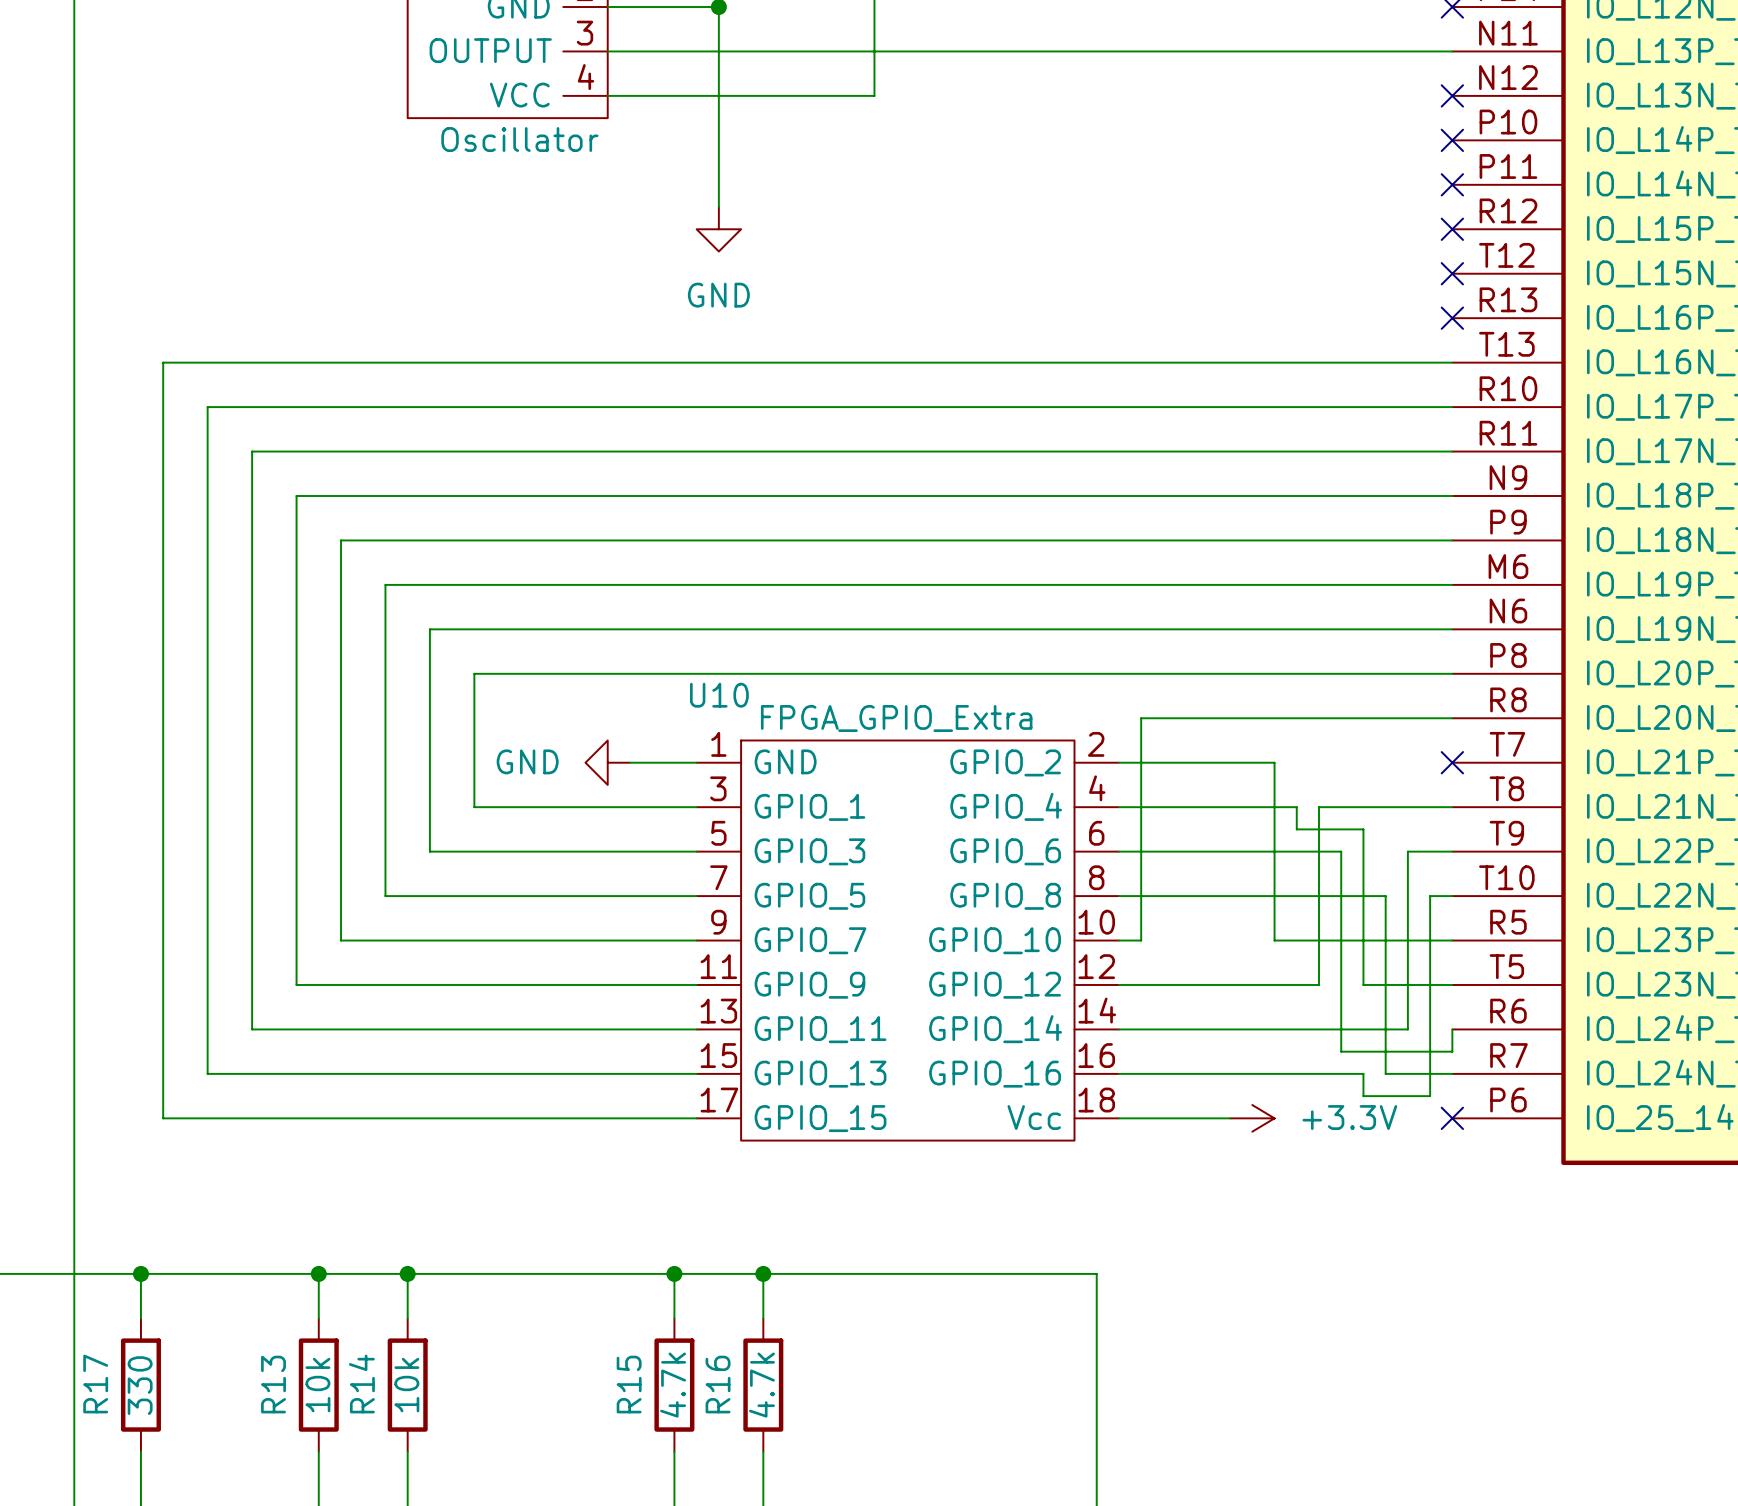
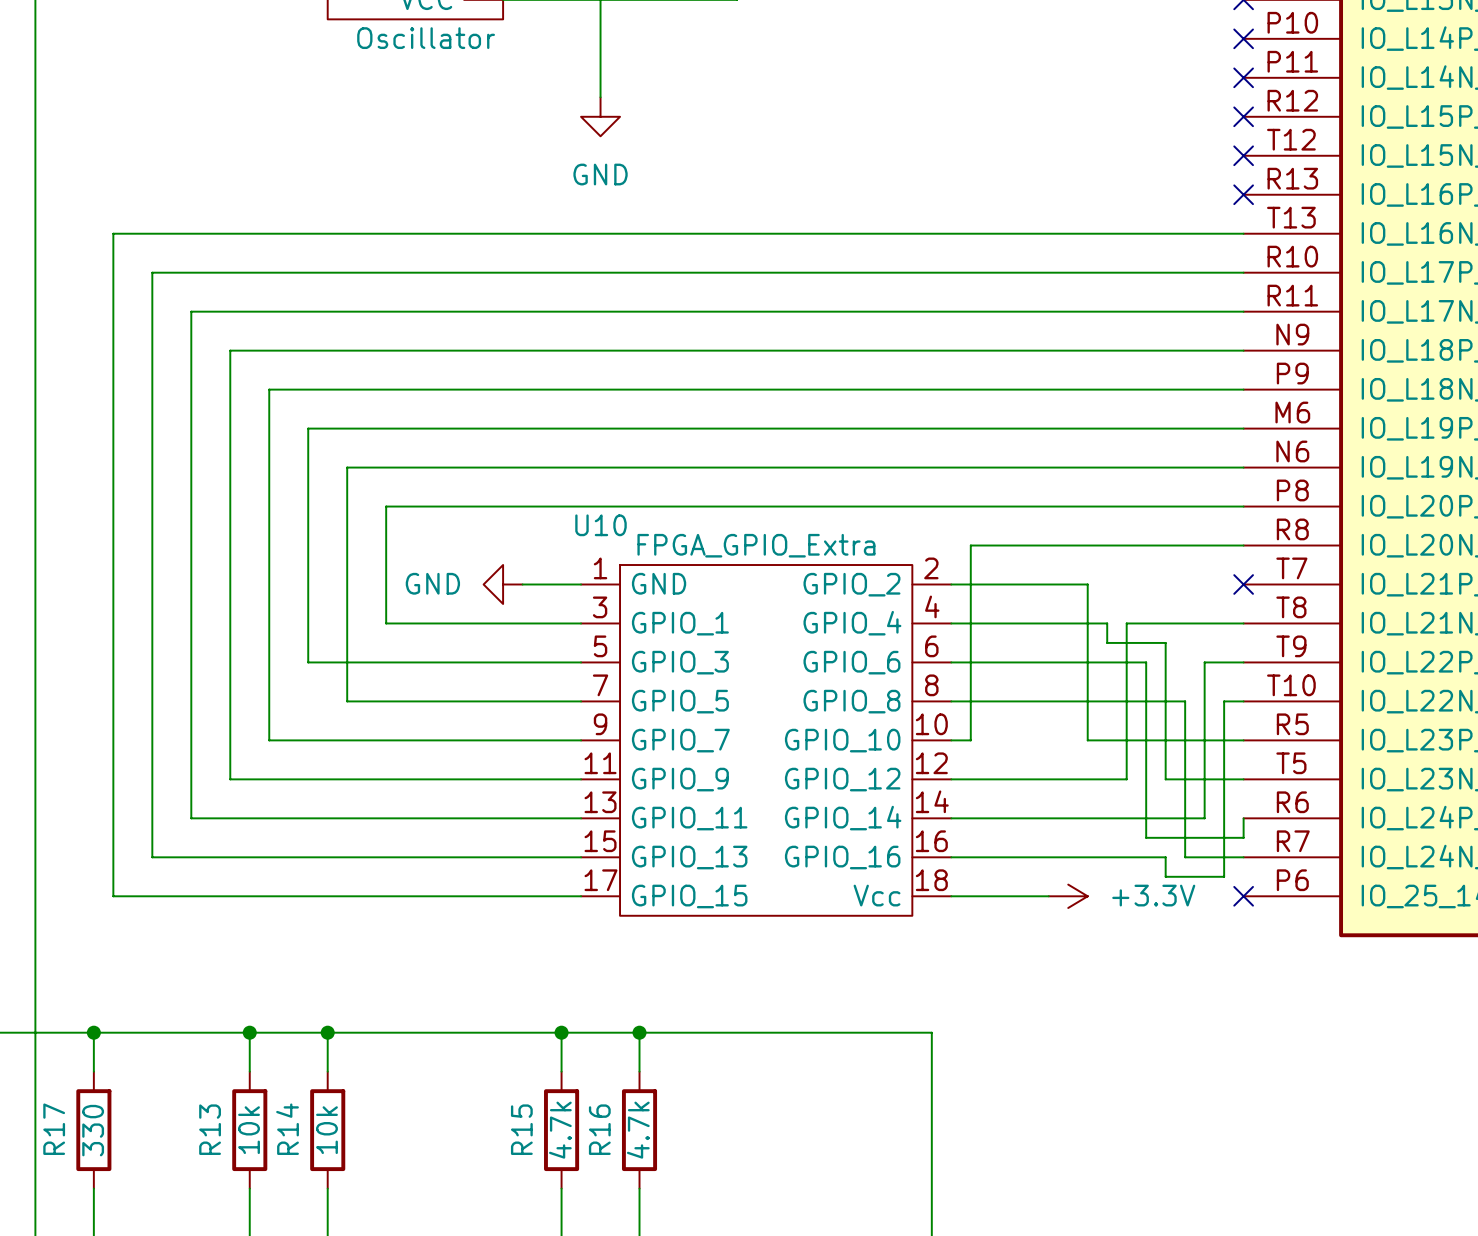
wire: (385, 851) (385, 896) (429, 896) -> (308, 662) (347, 662) (347, 701)

